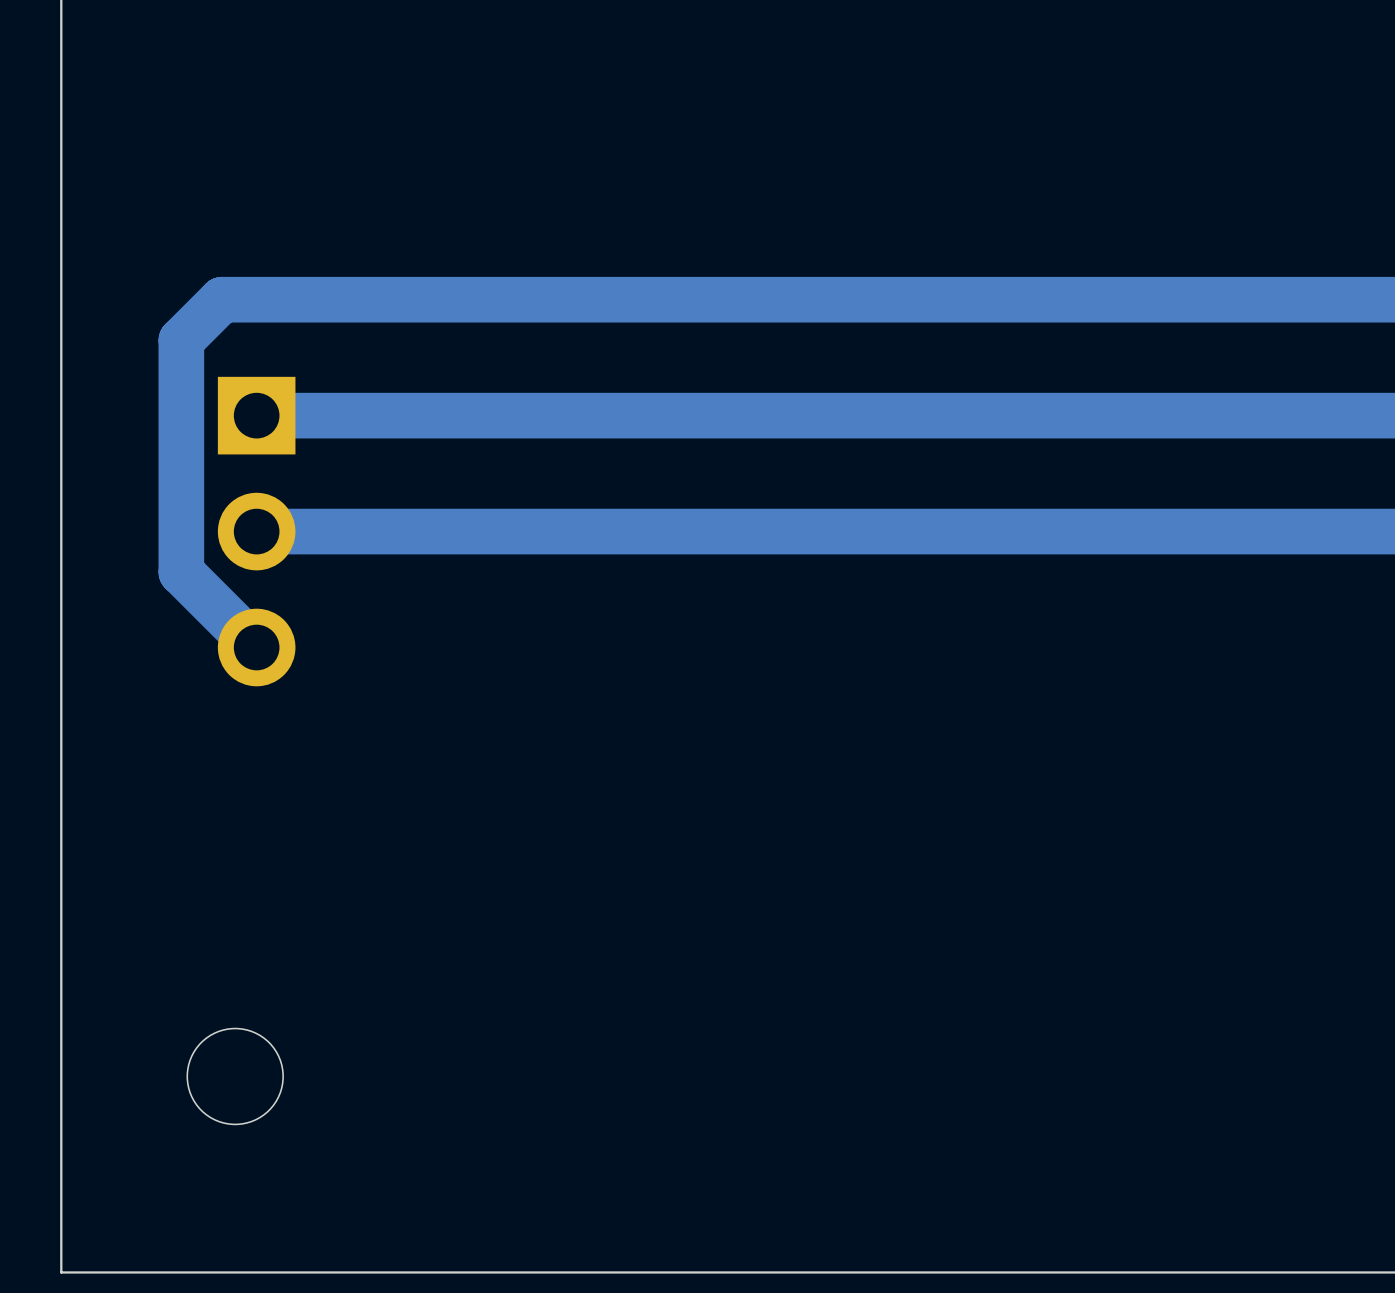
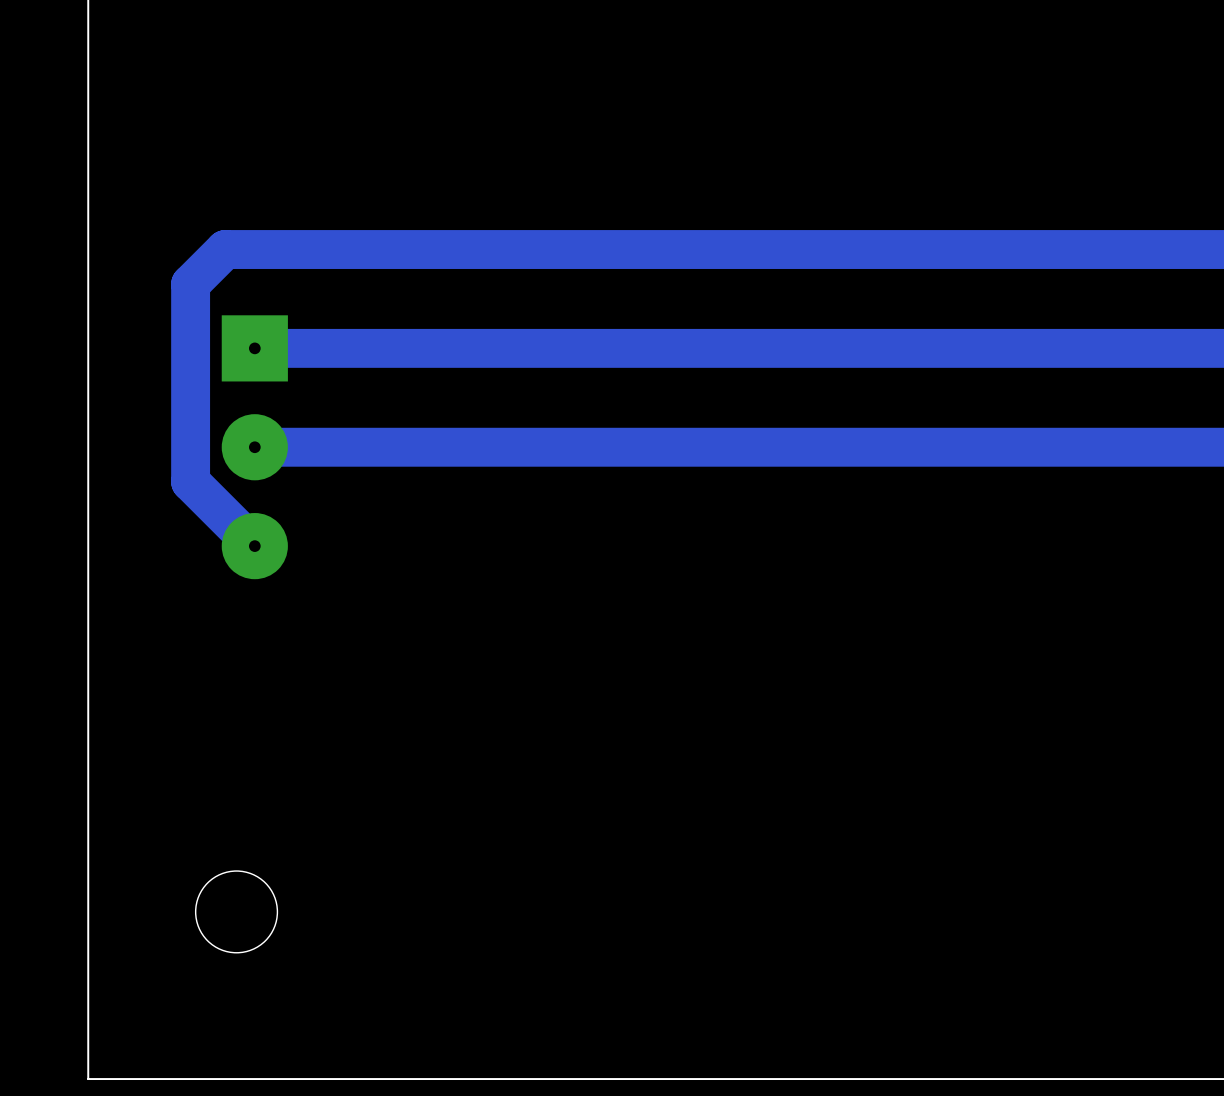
part footprint: [217, 376, 296, 687] -> [221, 315, 288, 580]

